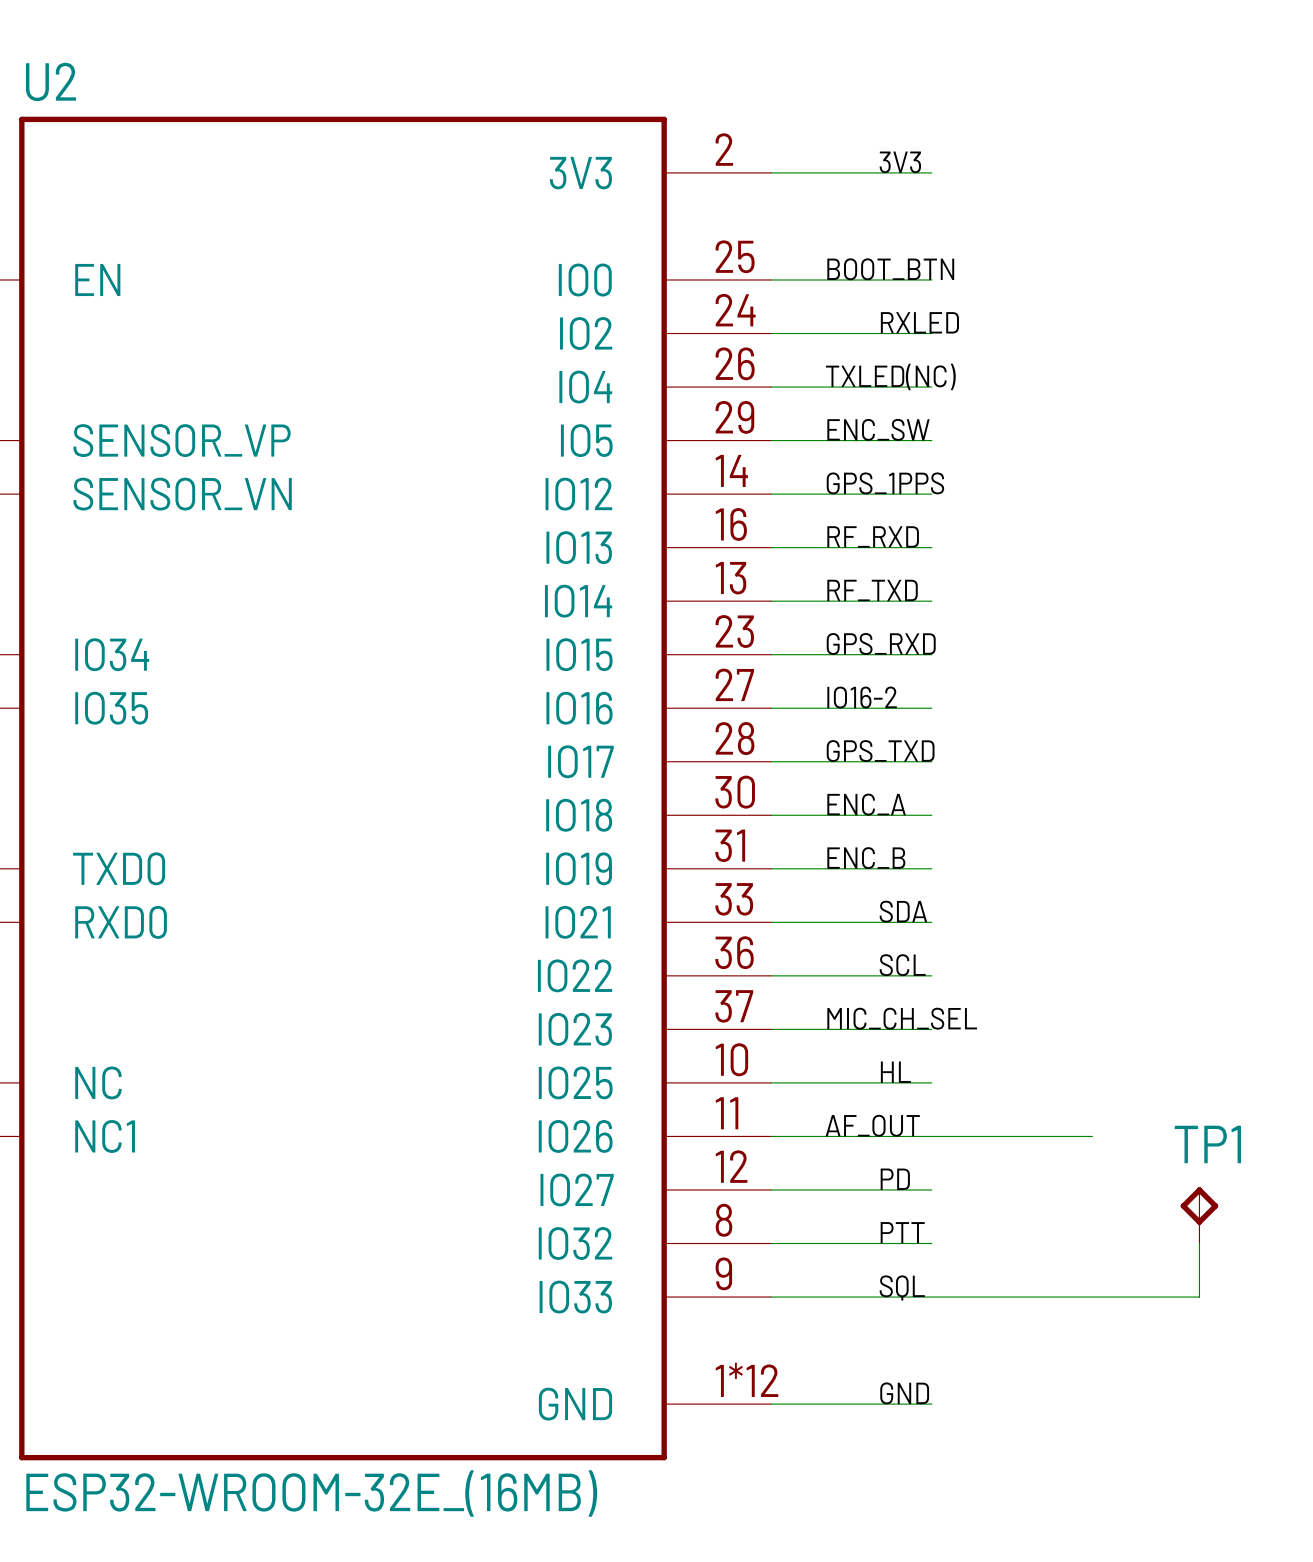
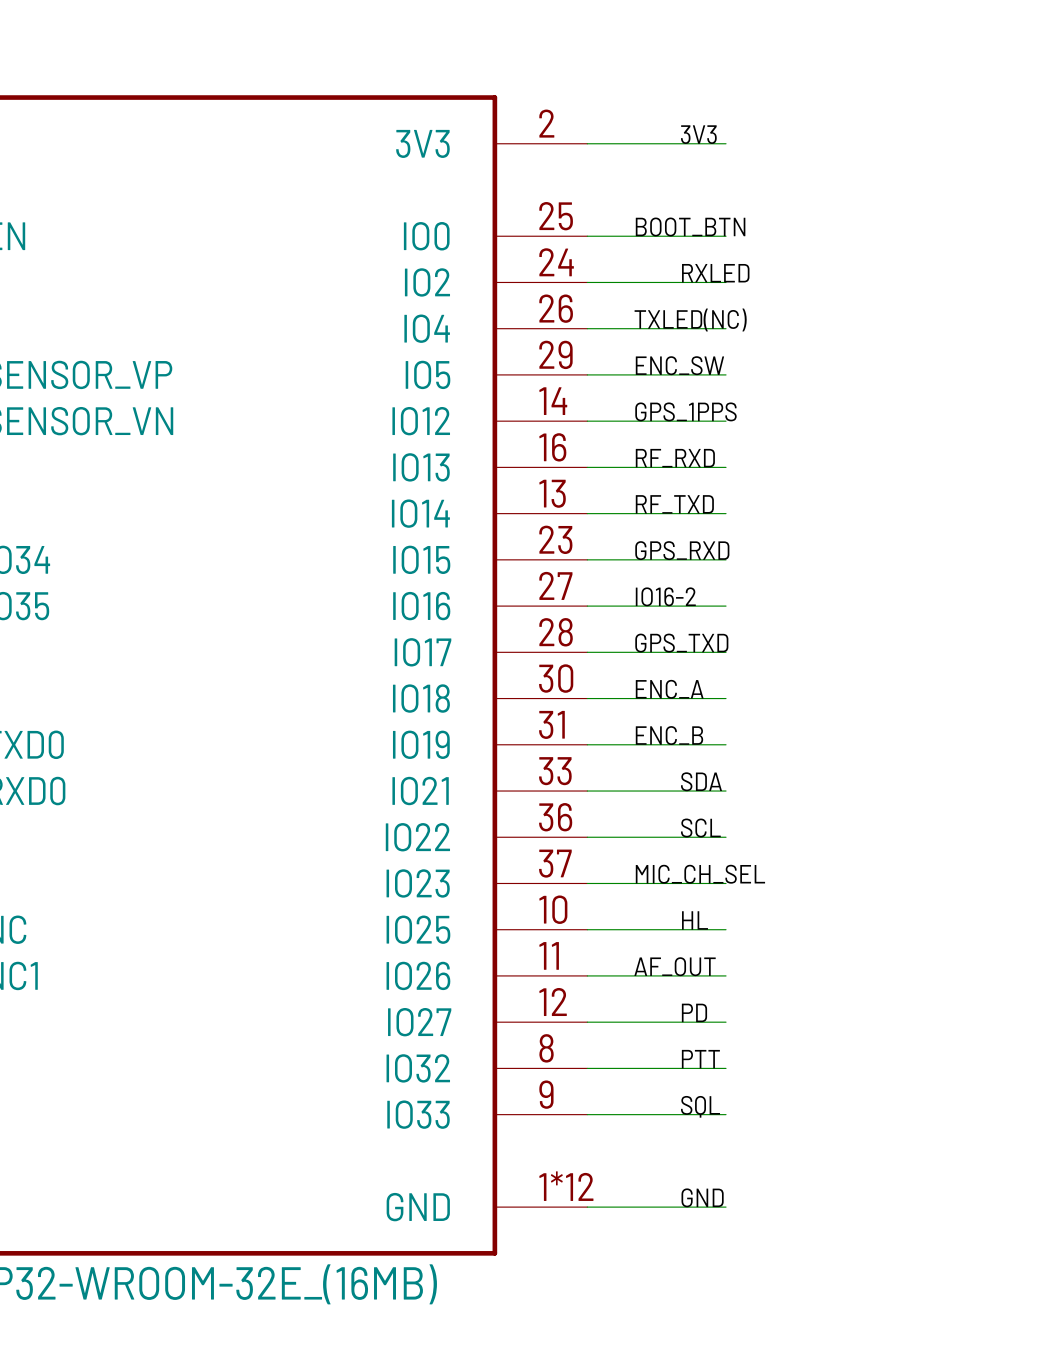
wire: (931, 1136) (1092, 1136) -> none
TP1: (1199, 1215) -> none
wire: (1199, 1243) (1199, 1297) (931, 1297) -> none

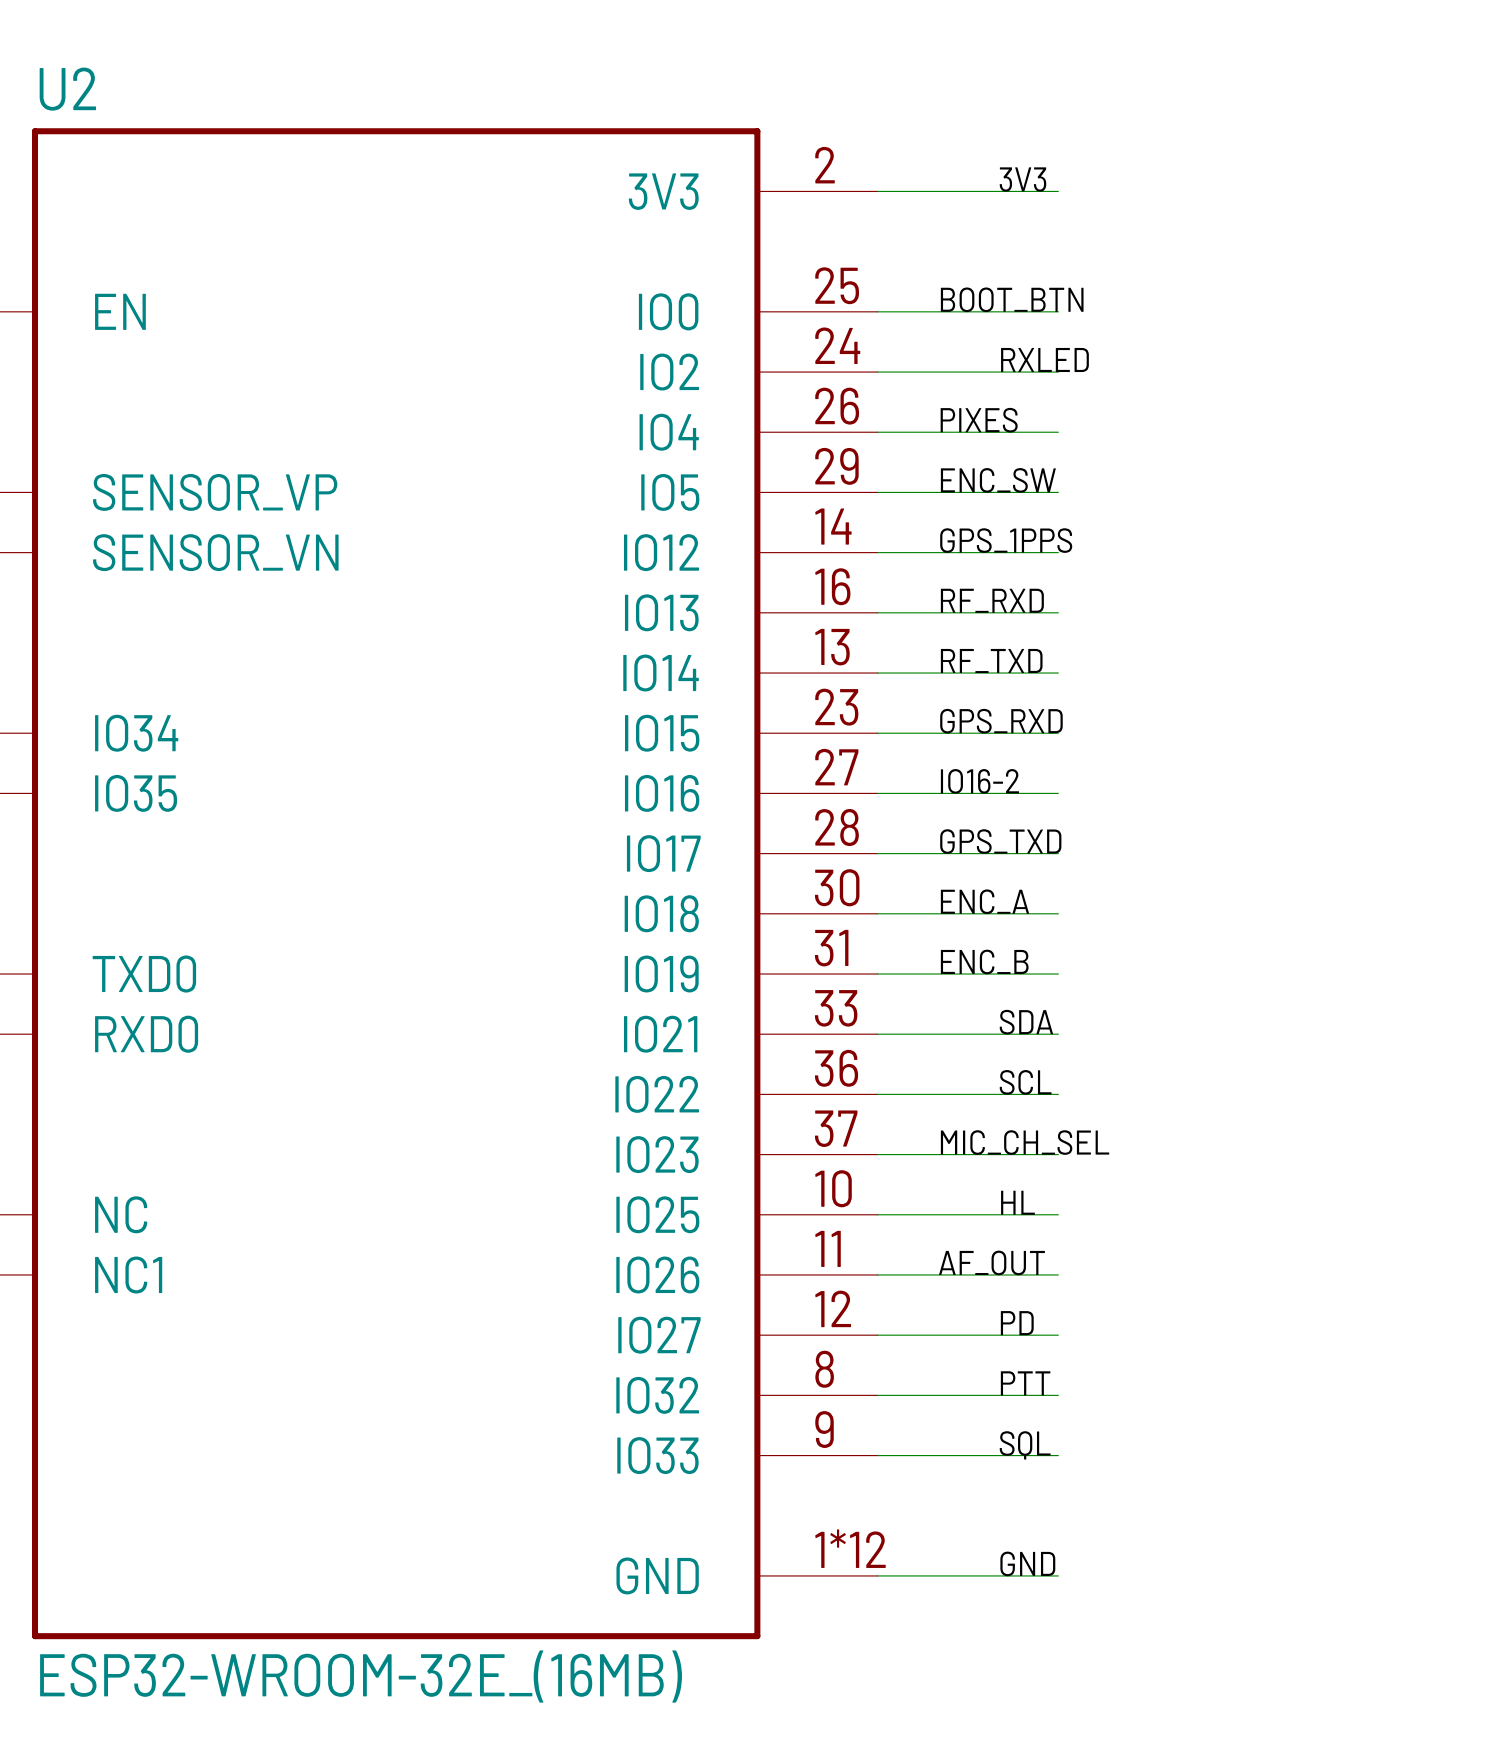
label: TXLED(NC) (690, 319) -> PIXES (979, 420)

